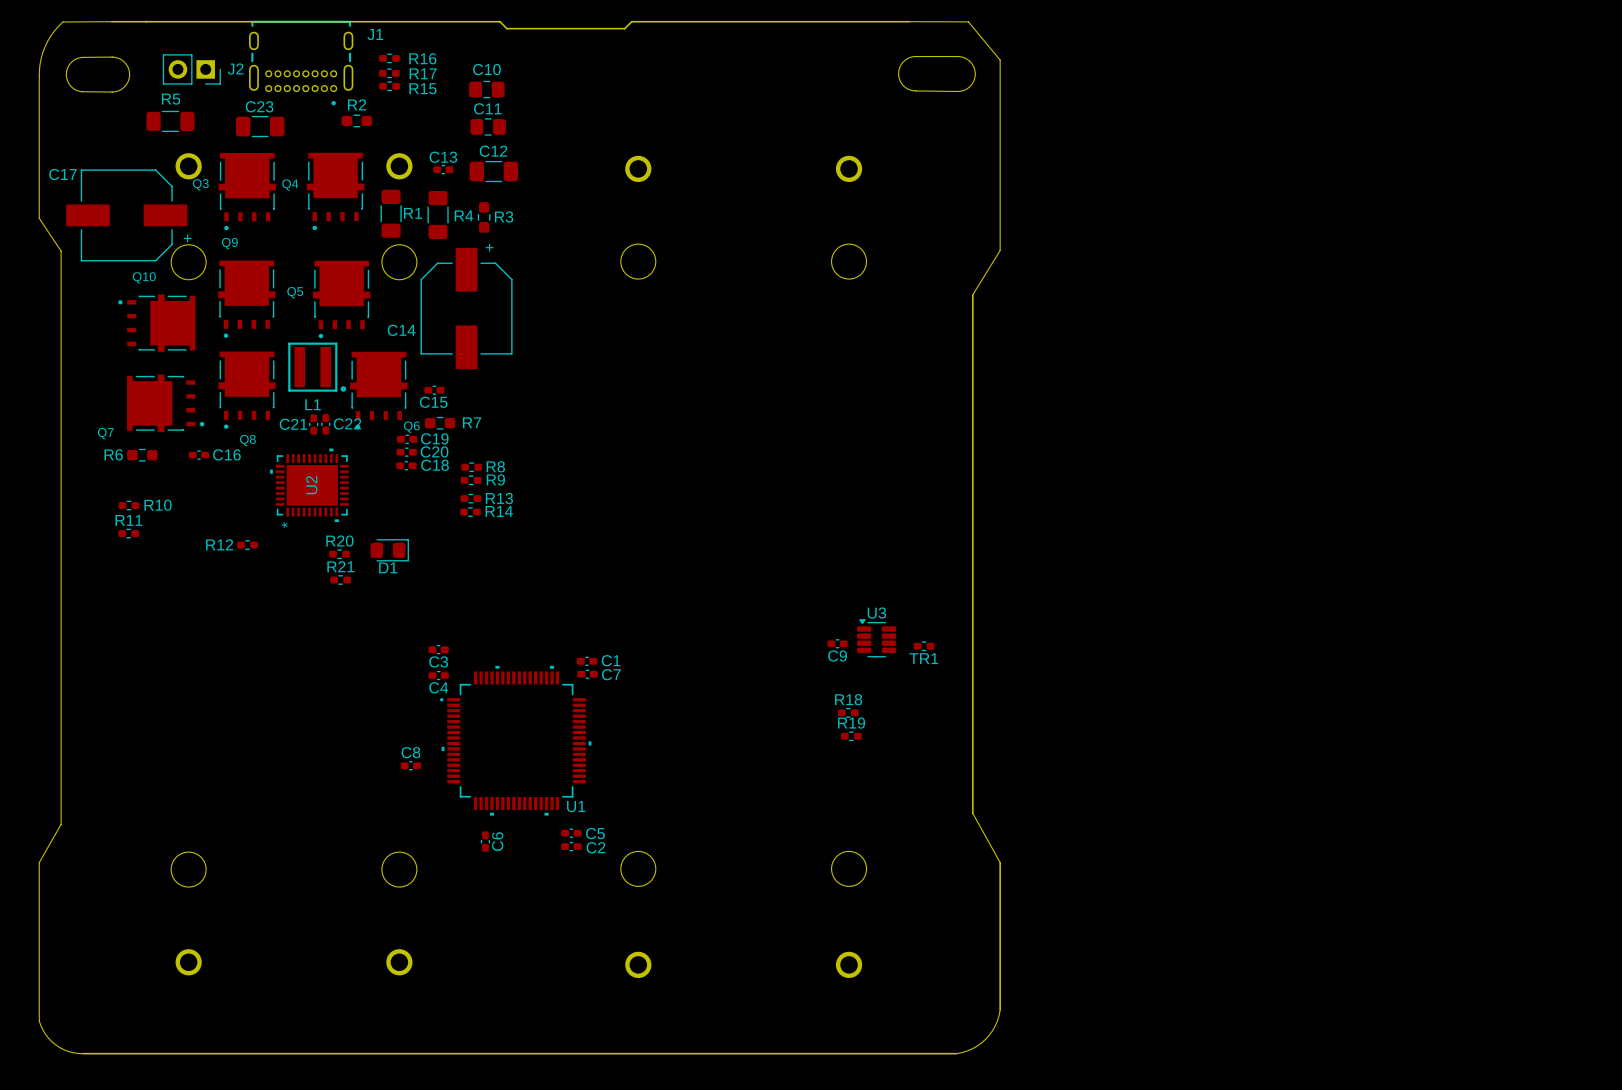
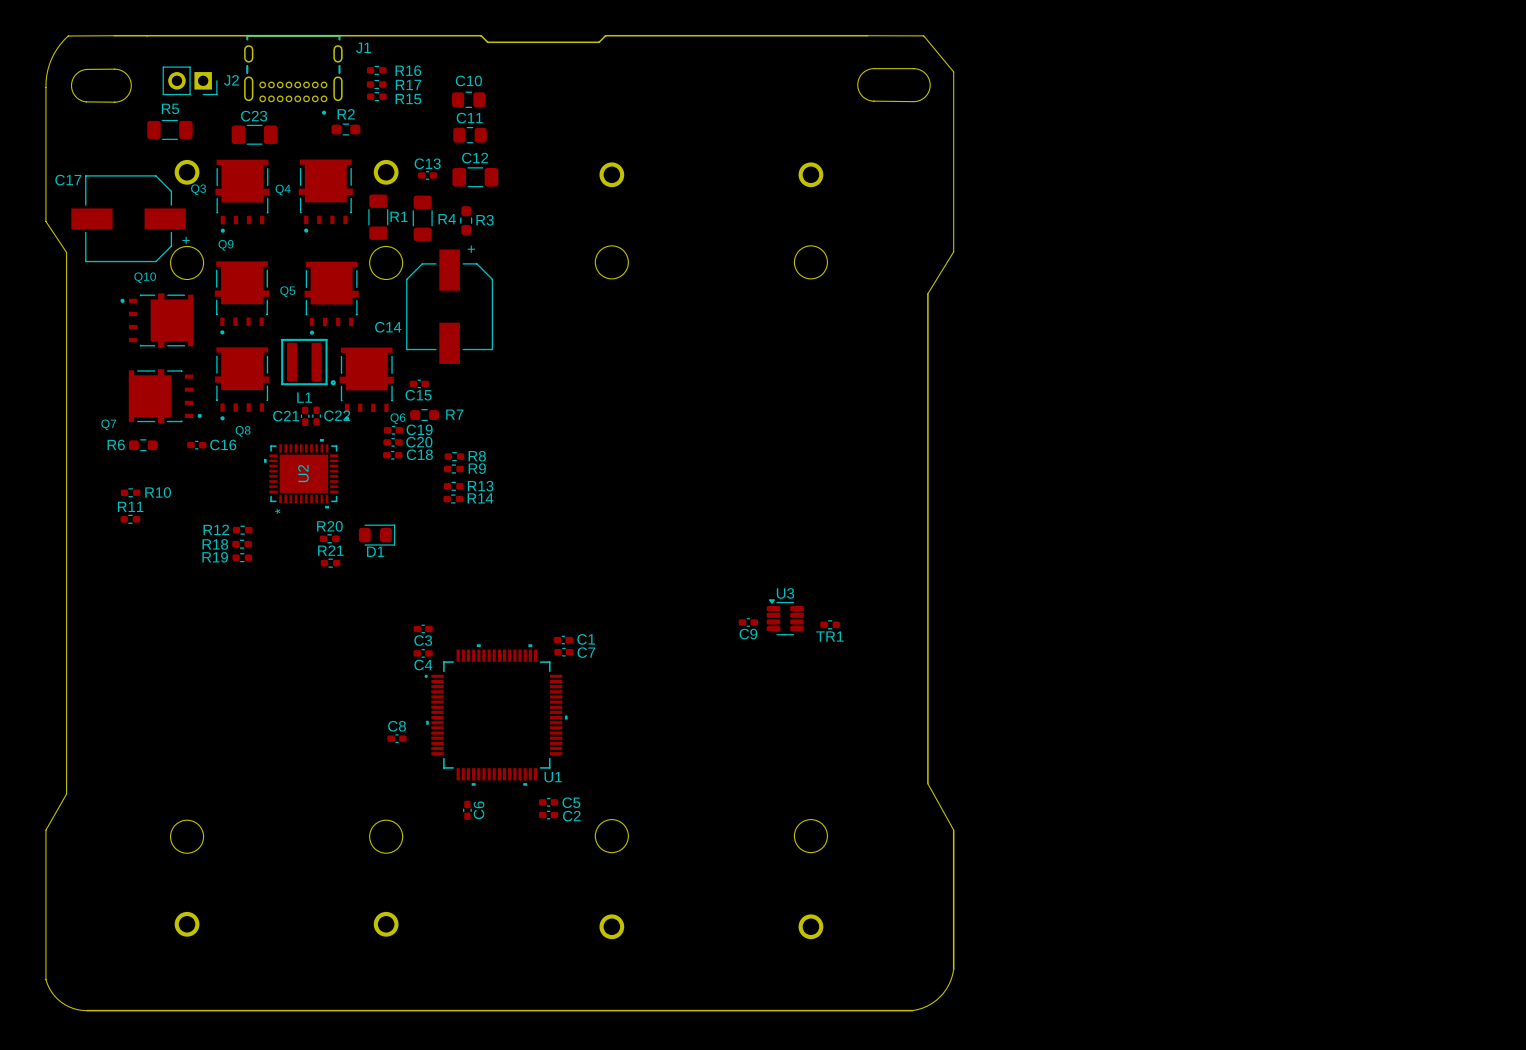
U3 position: (876, 638) -> (785, 617)
C9 position: (837, 643) -> (748, 622)
TR1 position: (924, 646) -> (830, 624)
R18 name position: R18 (848, 699) -> R18 (215, 544)
R18 position: (848, 712) -> (242, 544)
R19 name position: R19 (851, 723) -> R19 (215, 557)
R19 position: (851, 736) -> (242, 557)

